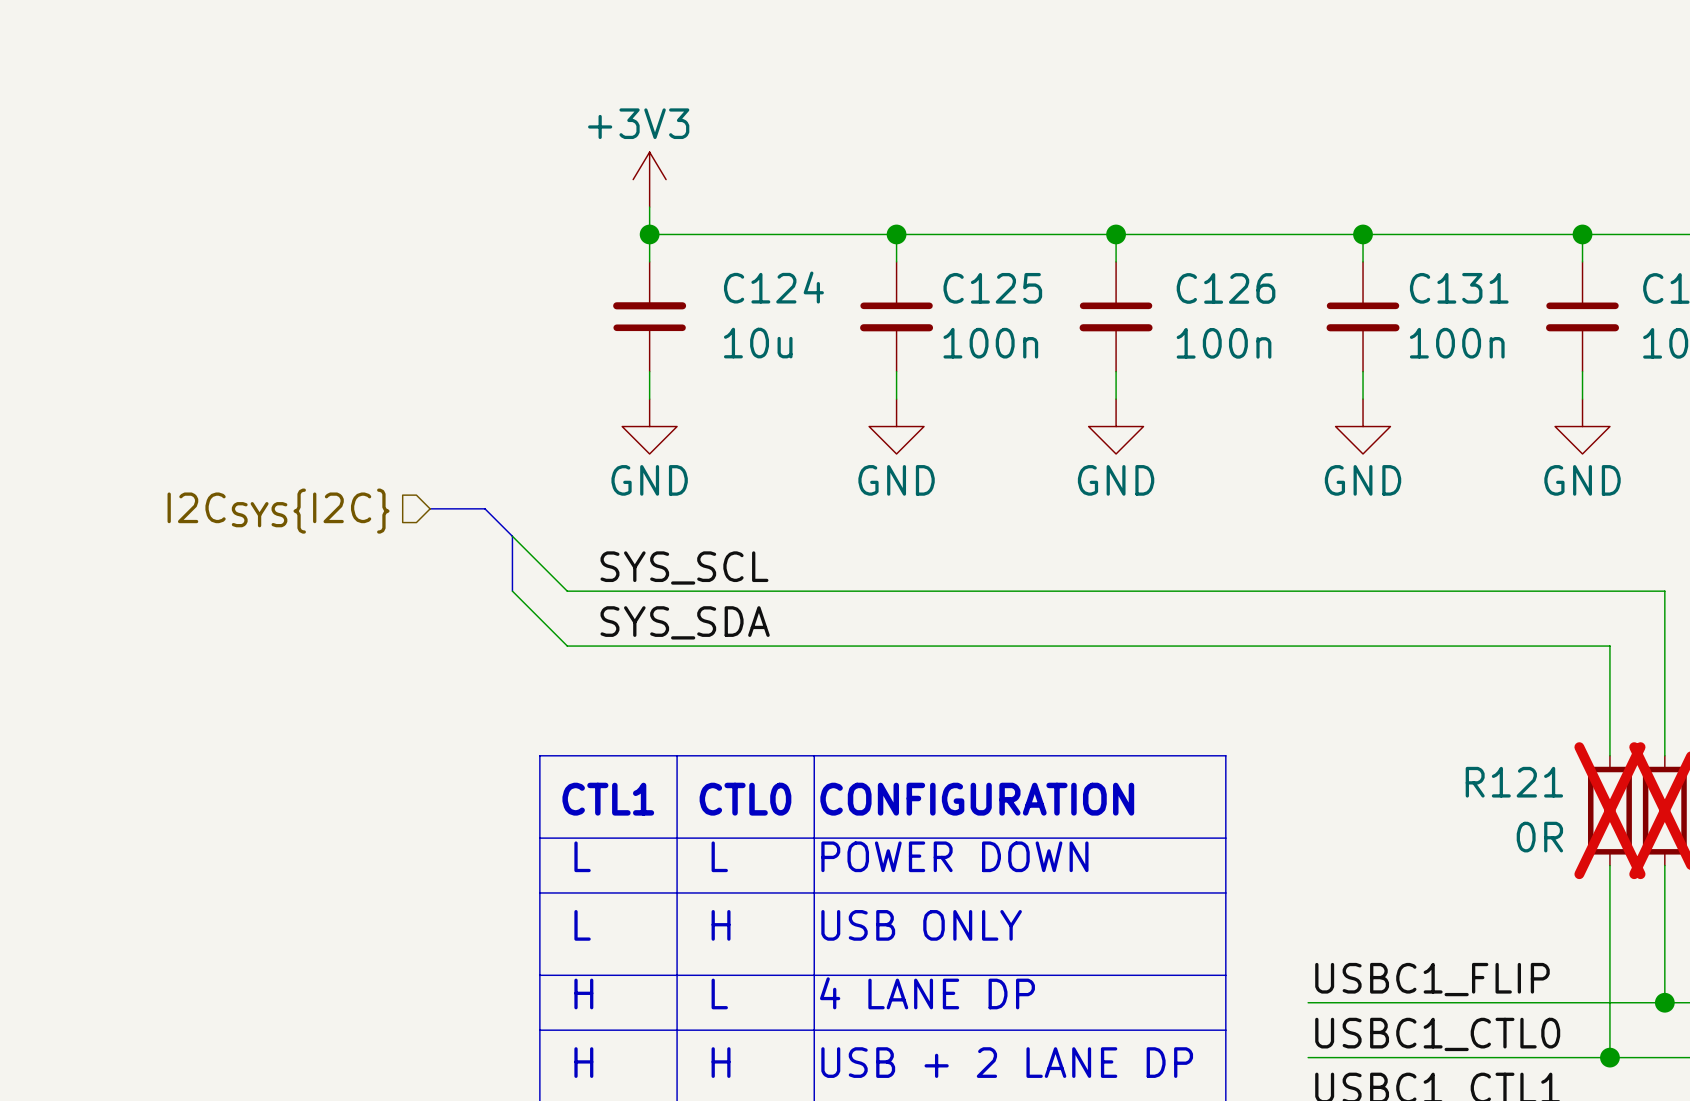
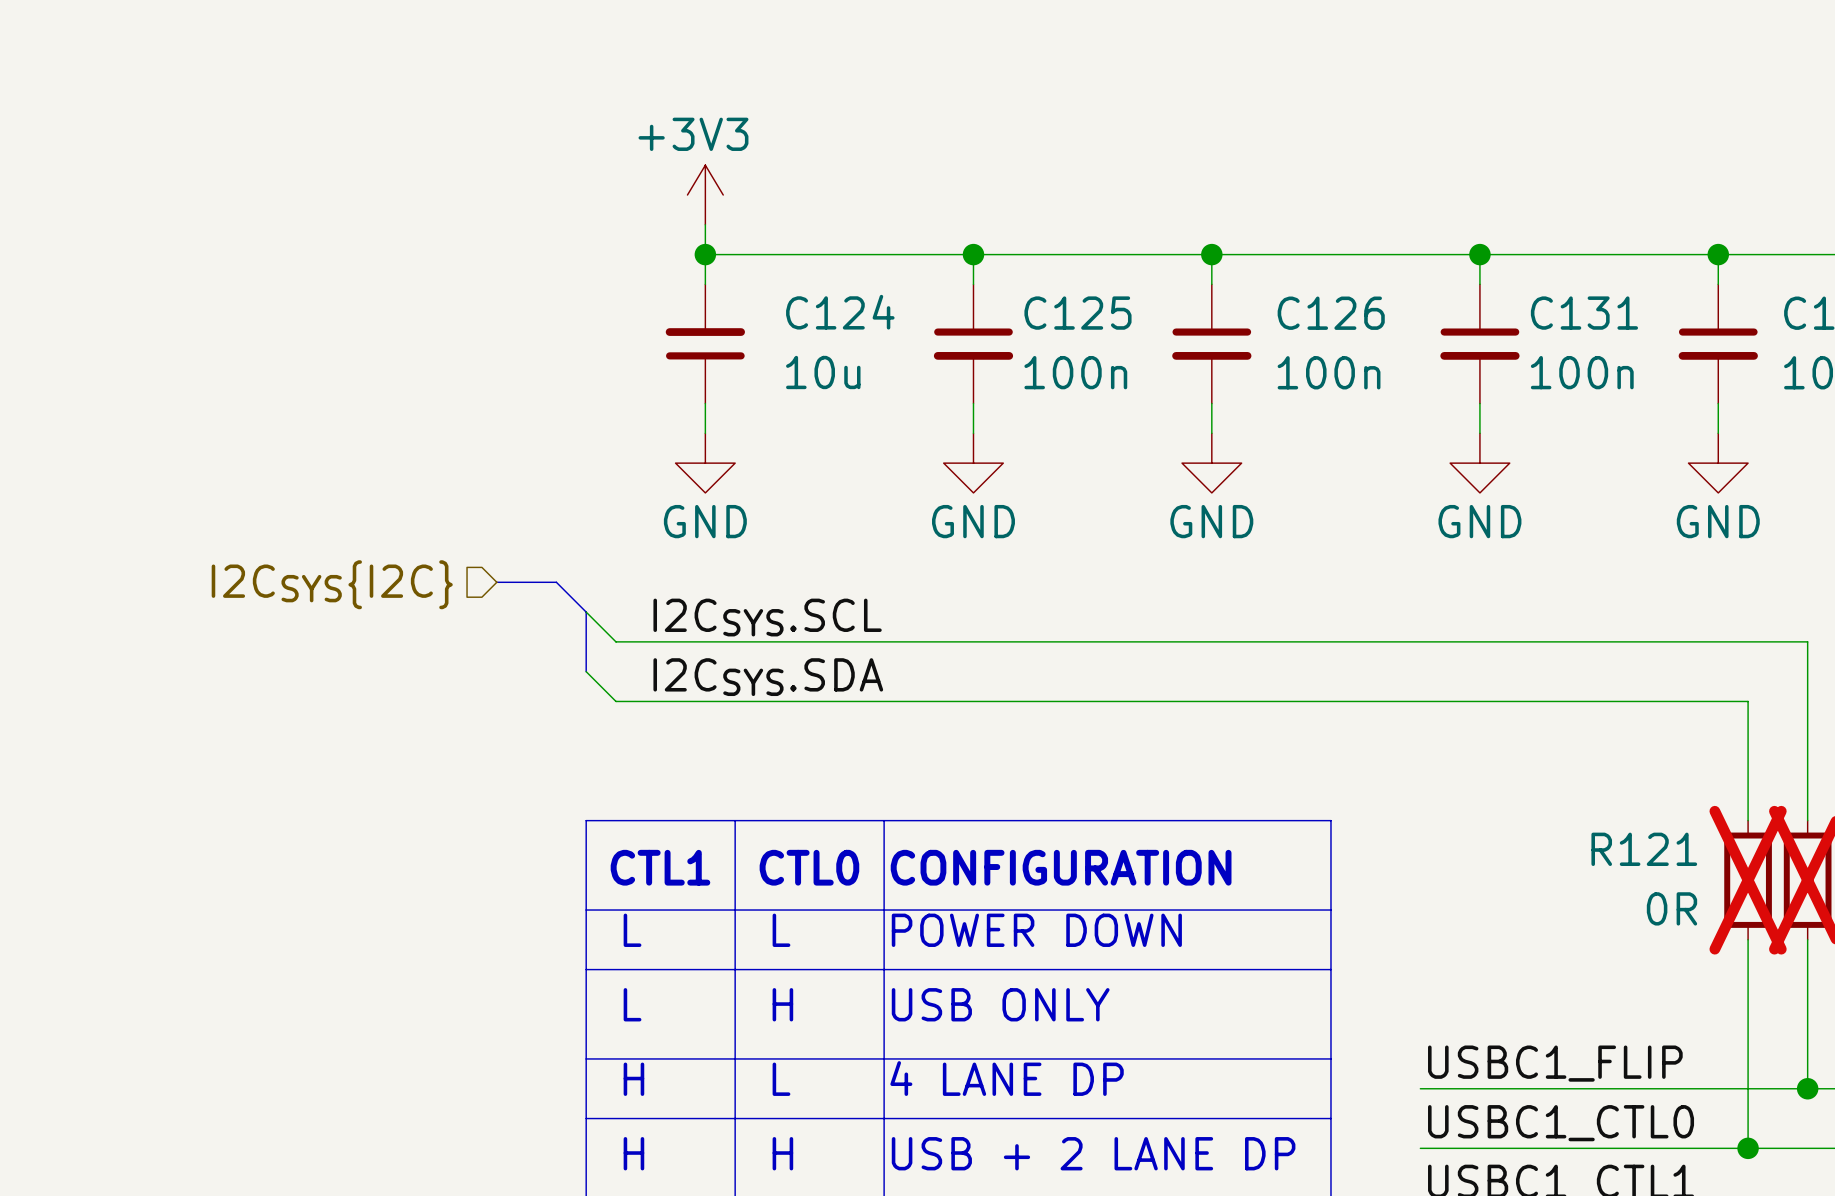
bus: (430, 508) (485, 508) (512, 536) (512, 591) -> (496, 582) (556, 582) (586, 612) (586, 671)
hierarchical label position: I2CSYS{I2C} (278, 511) -> I2CSYS{I2C} (332, 584)
label: SYS_SCL (684, 567) -> I2CSYS.SCL (767, 617)
wire: (512, 591) (539, 618) -> none
label: SYS_SDA (685, 622) -> I2CSYS.SDA (768, 677)

